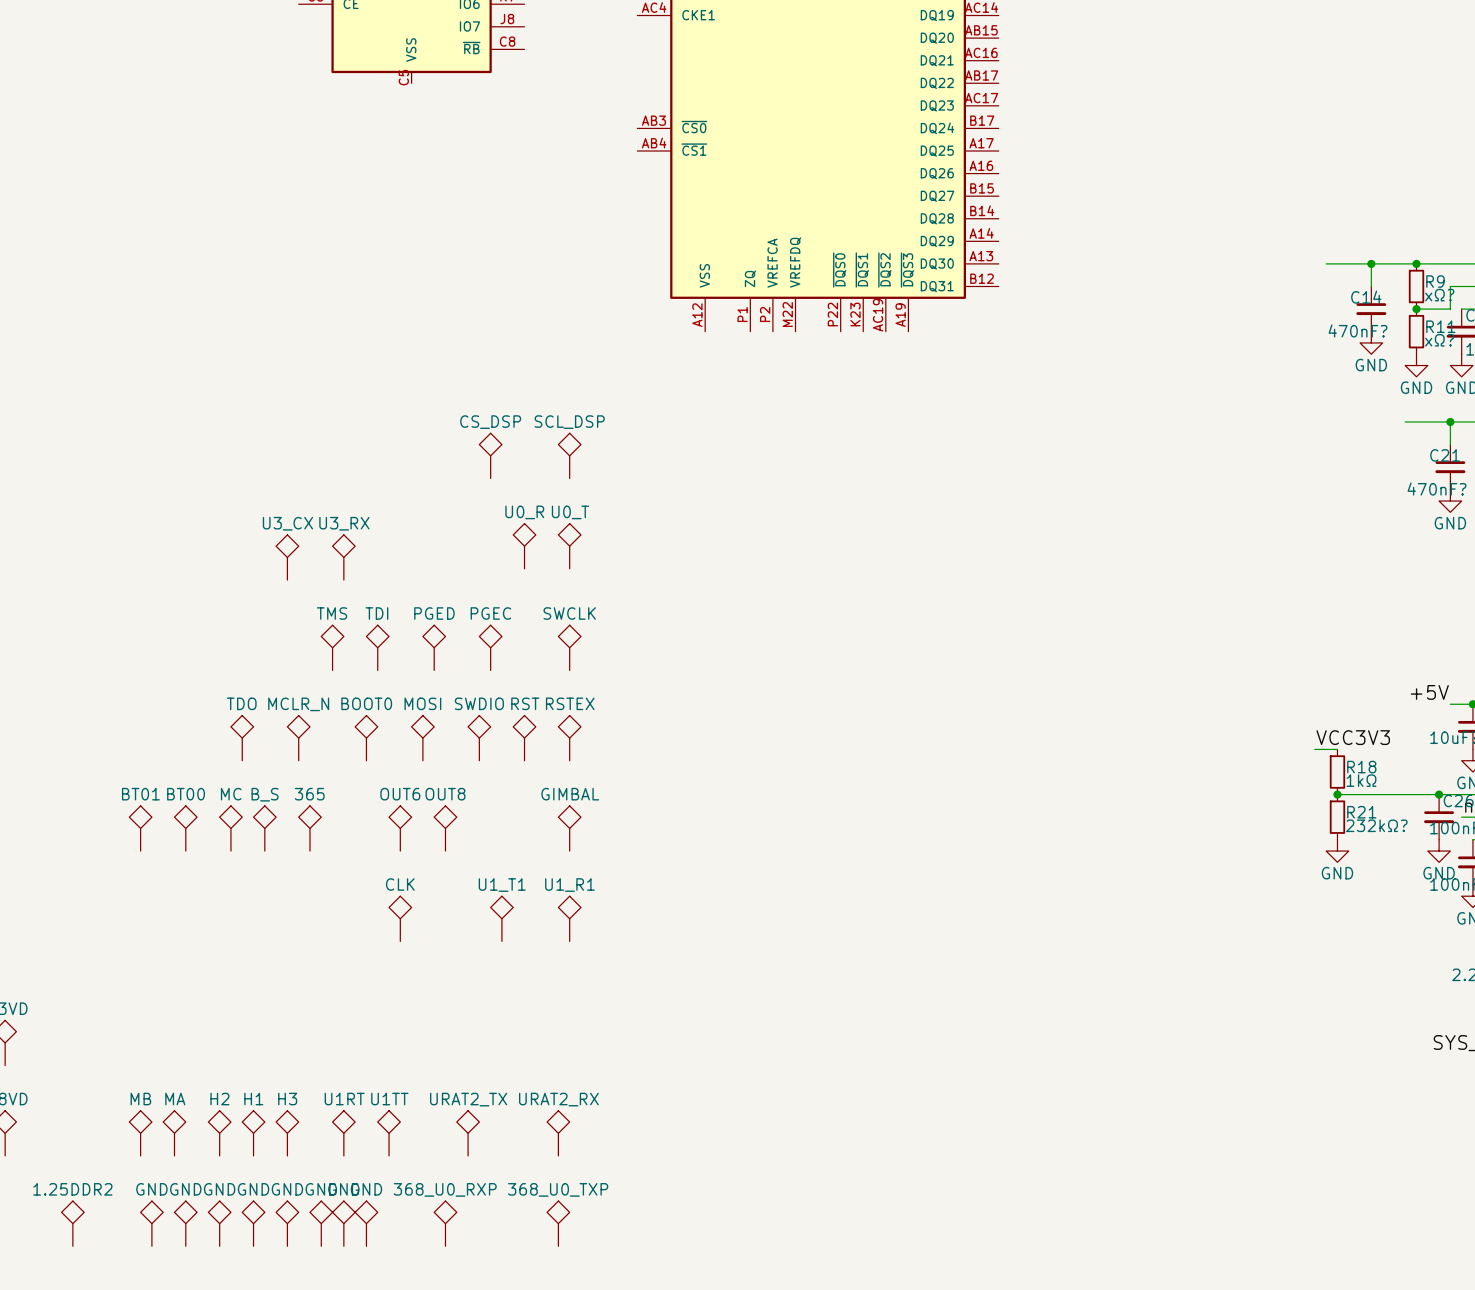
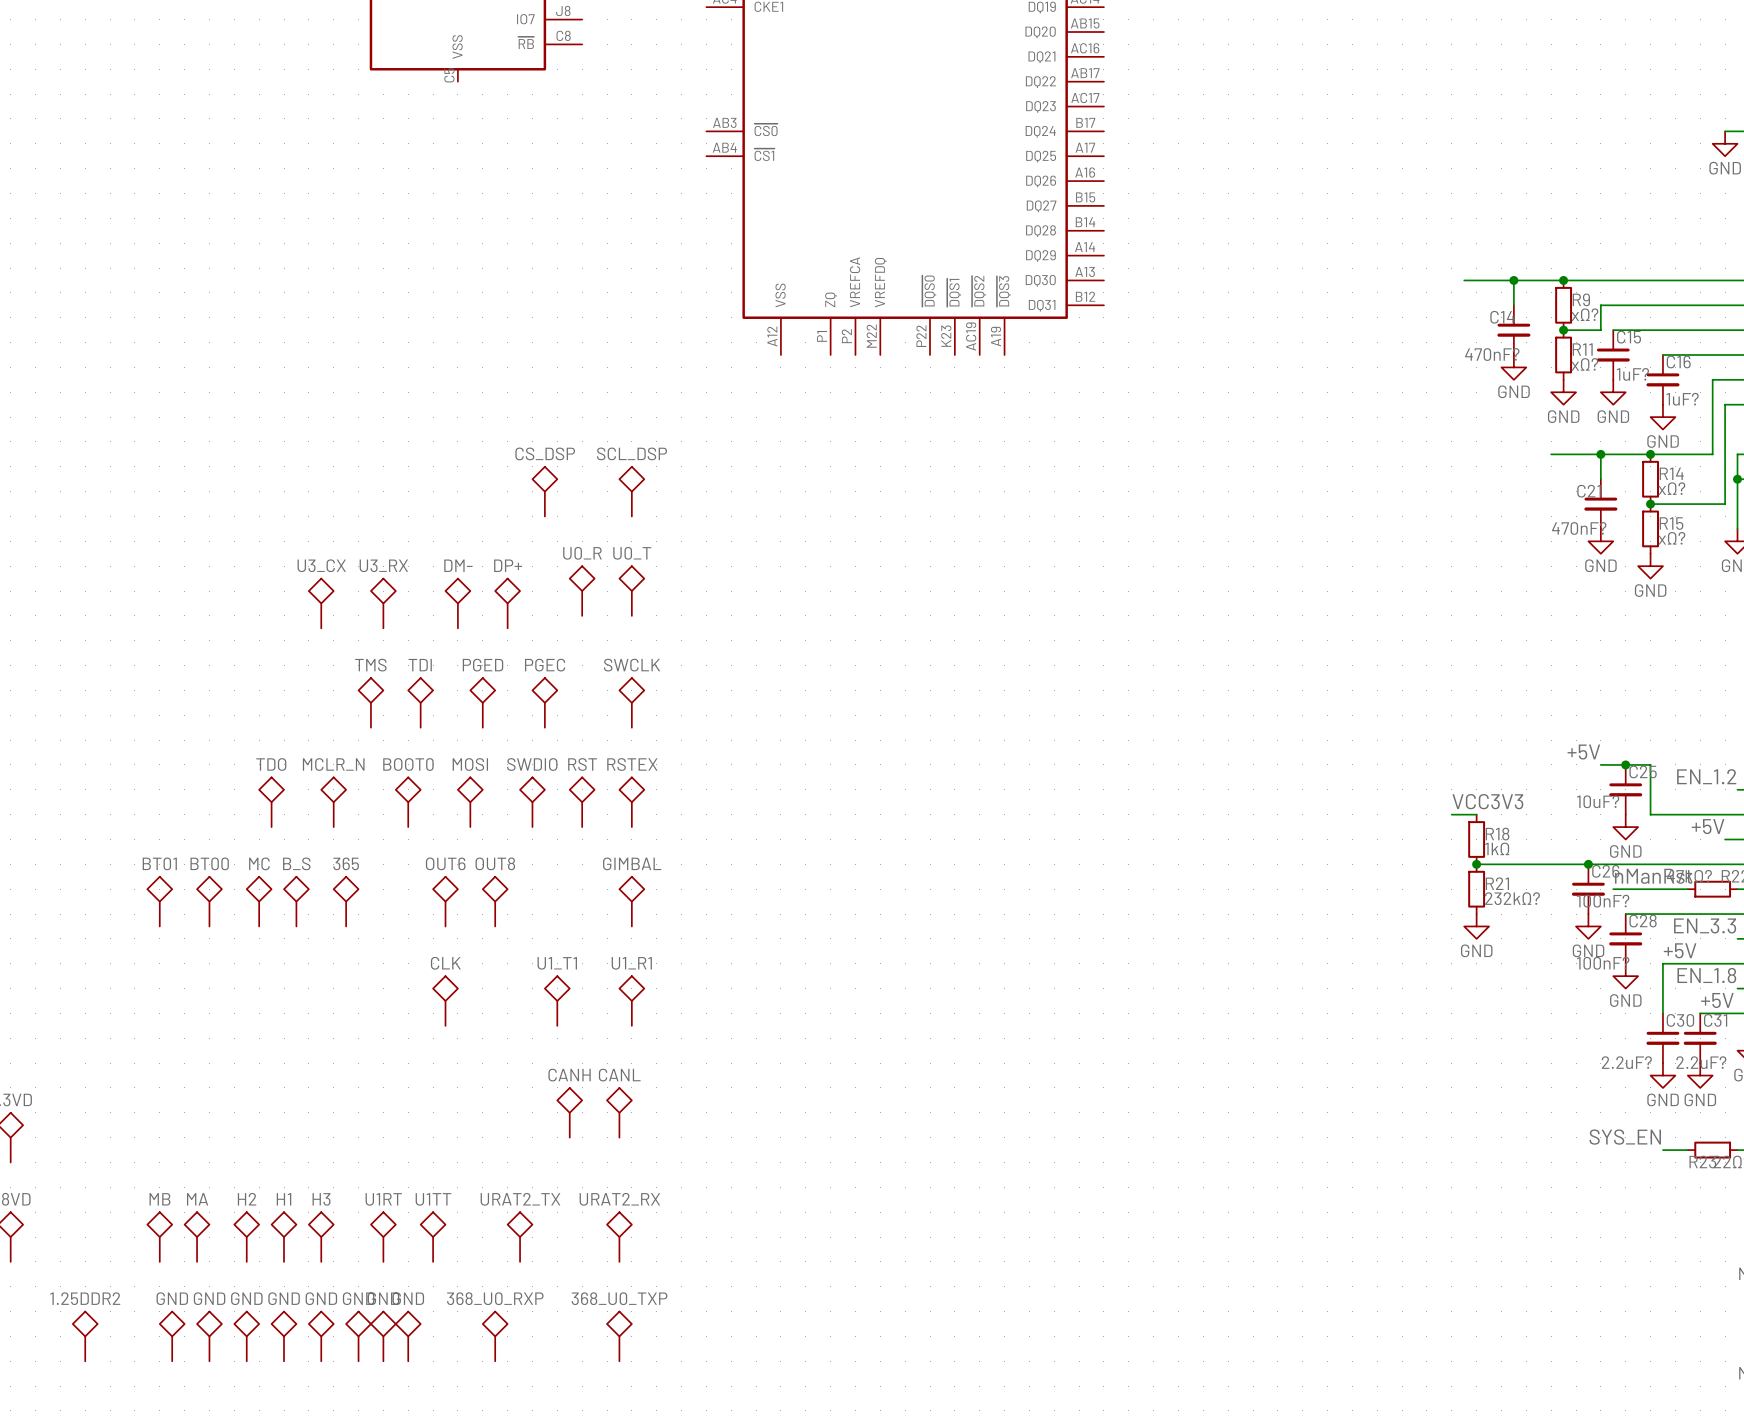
part: none -> DM- (457, 603)
part: none -> DP+ (507, 603)
part: none -> CANH (569, 1112)
part: none -> CANL (619, 1112)

